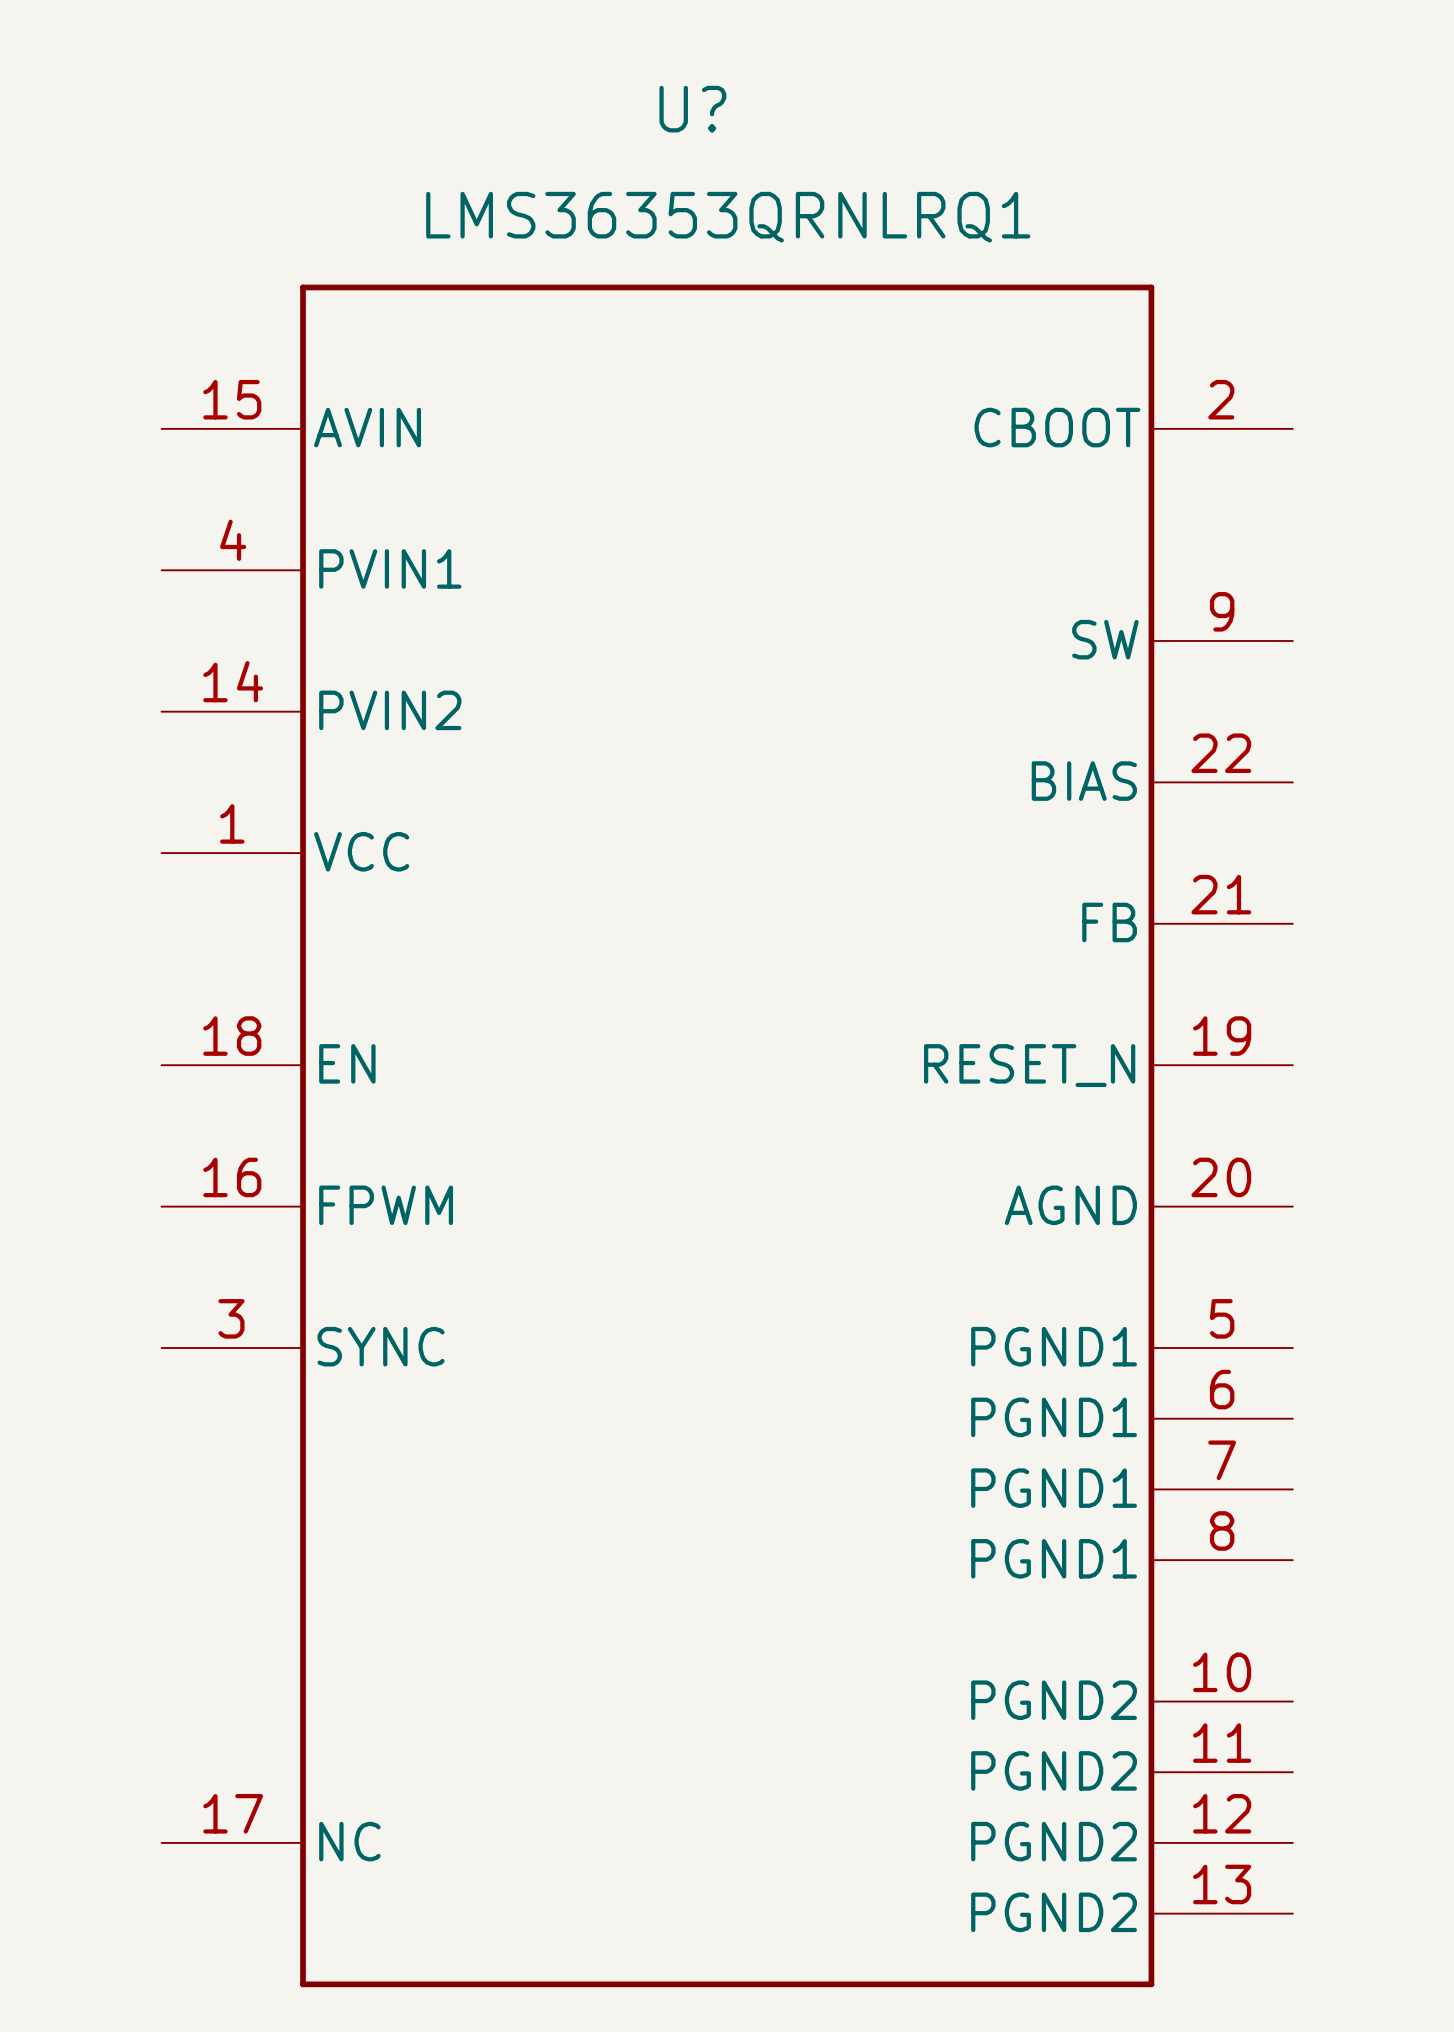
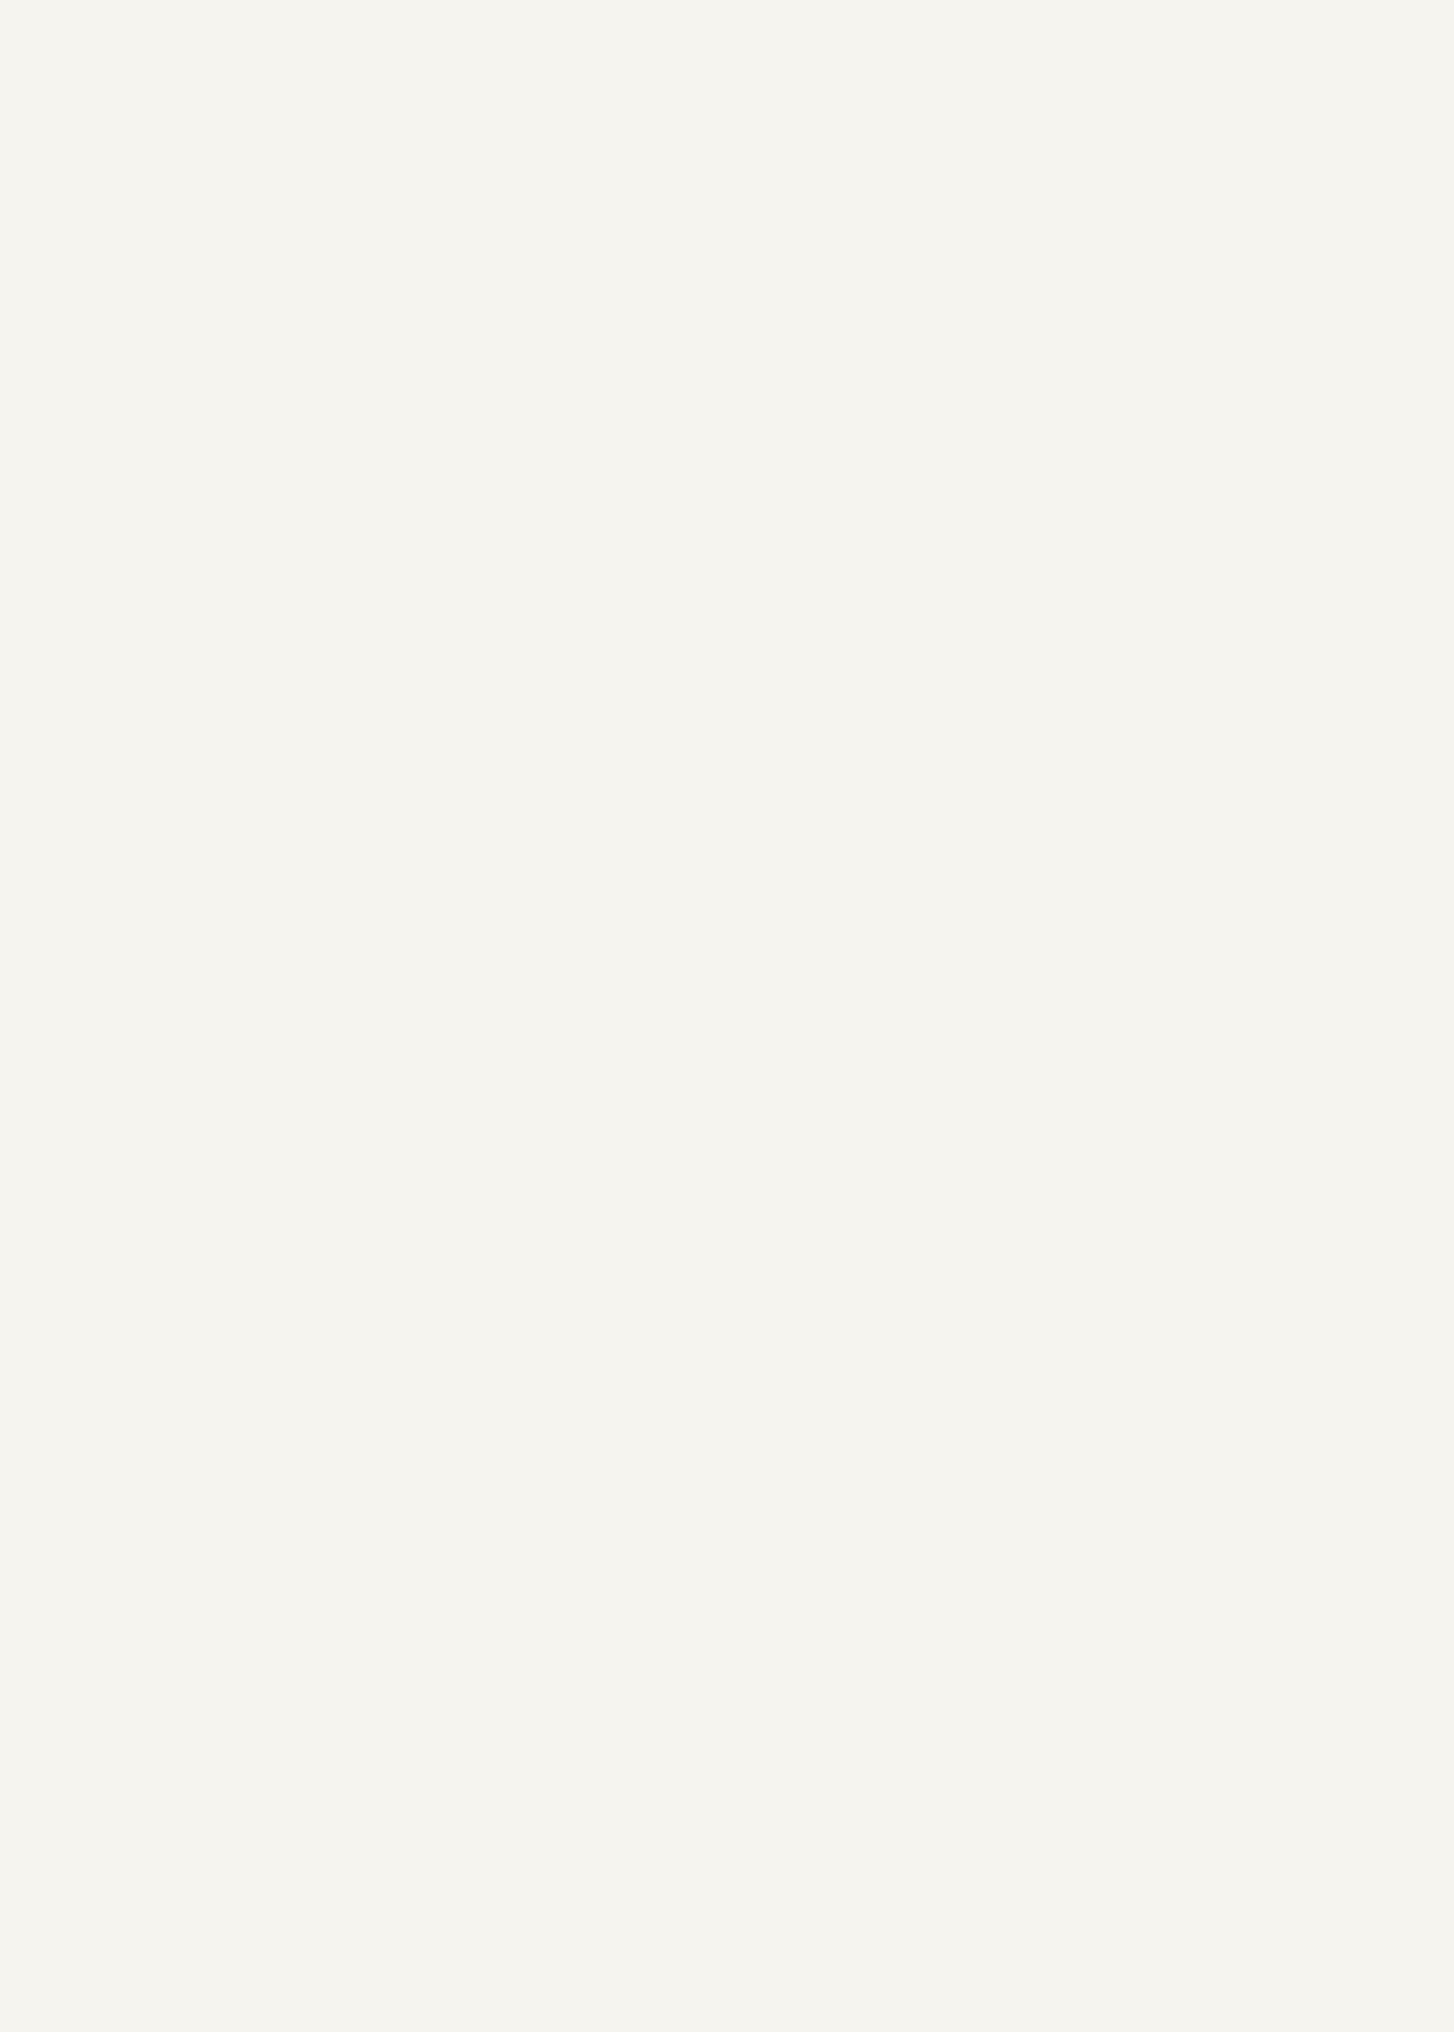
U?: LMS36353QRNLRQ1 (727, 1135) -> none

